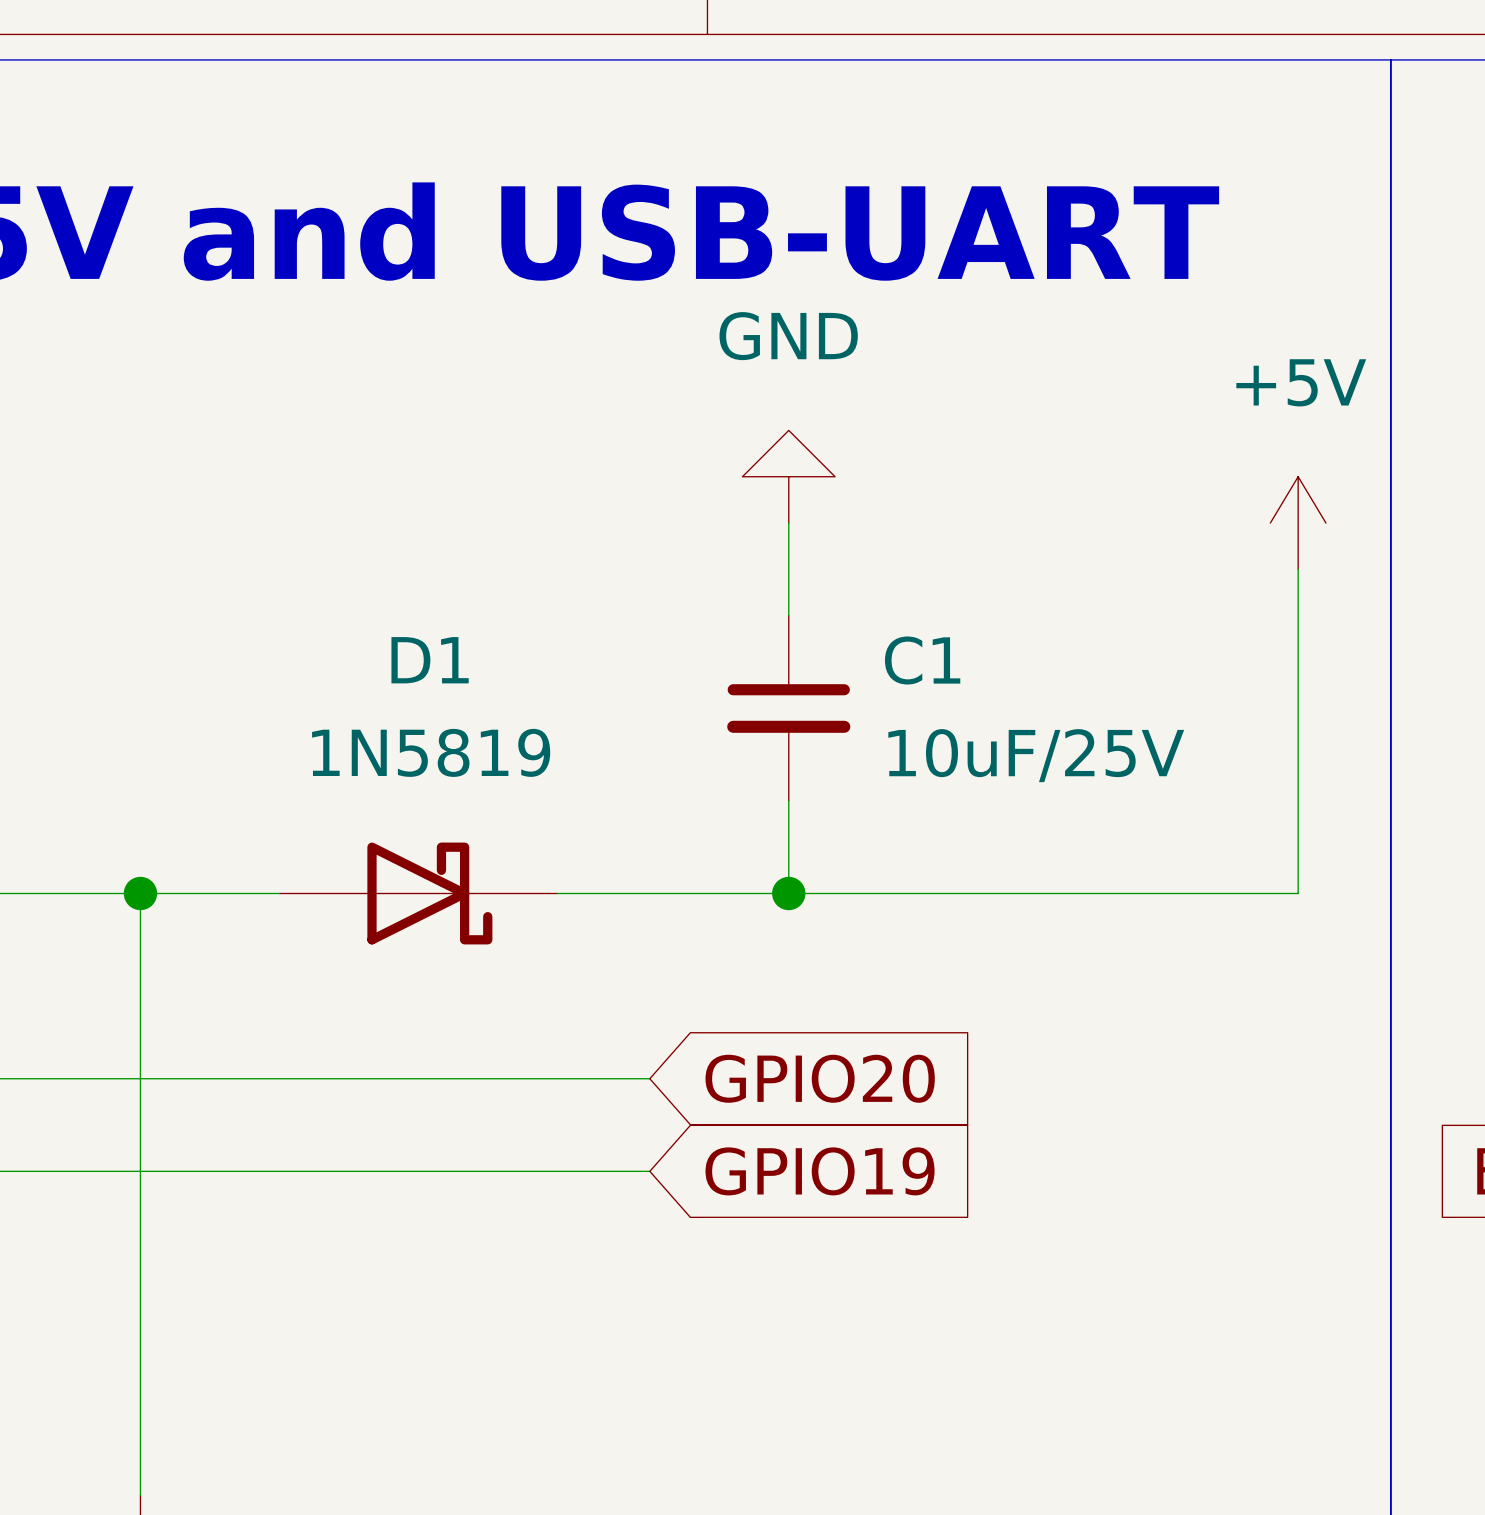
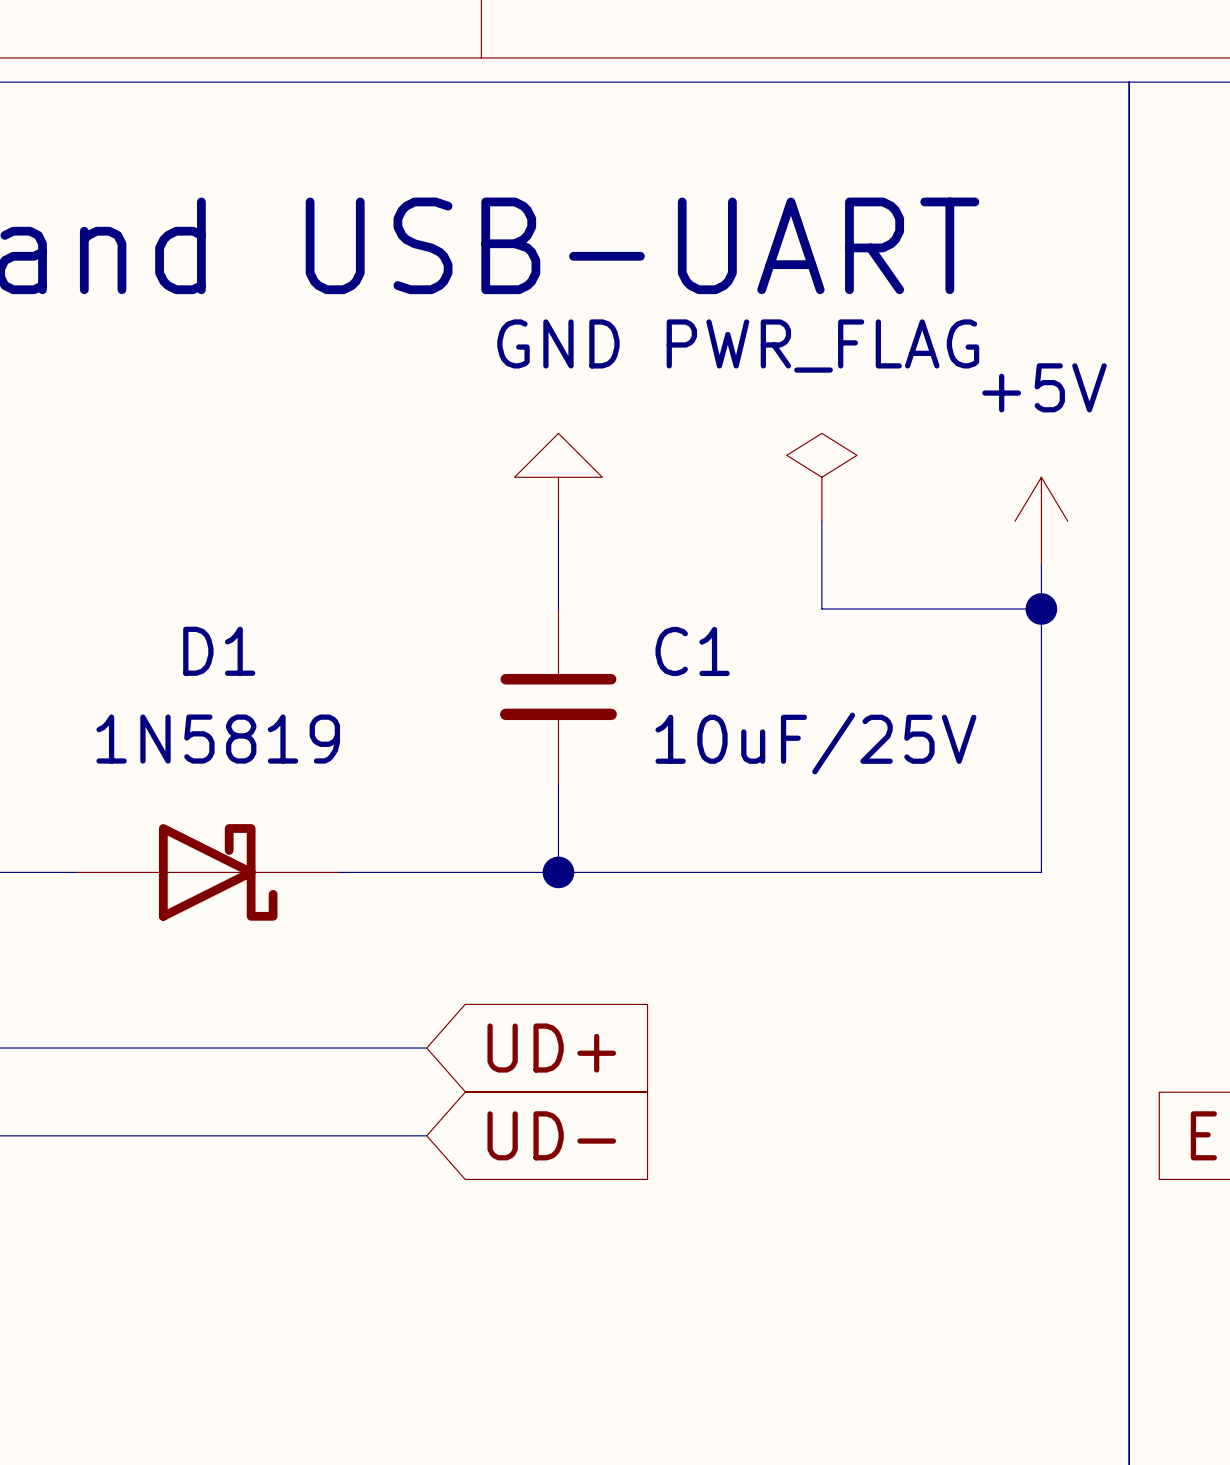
power symbol: none -> PWR_FLAG (821, 477)
wire: none -> (821, 521) (821, 608) (1041, 608)
junction: none -> (1041, 608)
global label: GPIO20 (820, 1078) -> UD+ (551, 1048)
global label: GPIO19 (820, 1171) -> UD- (551, 1135)

